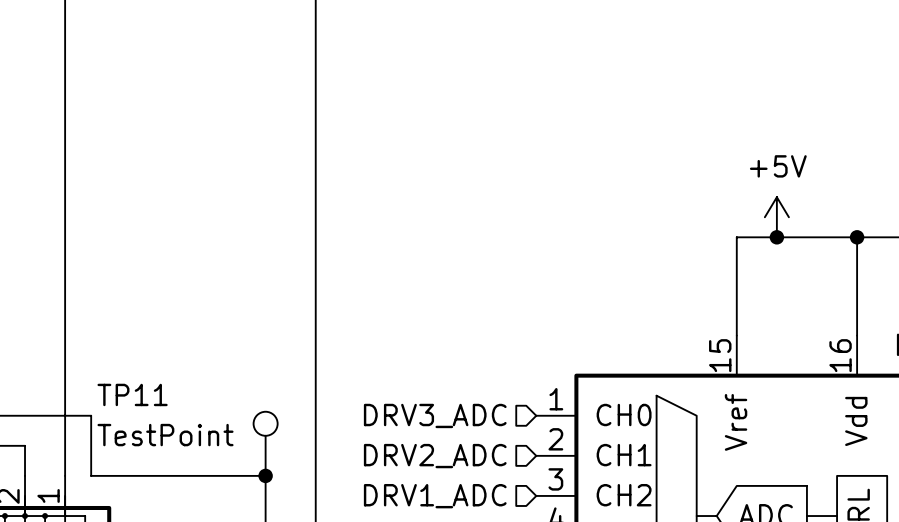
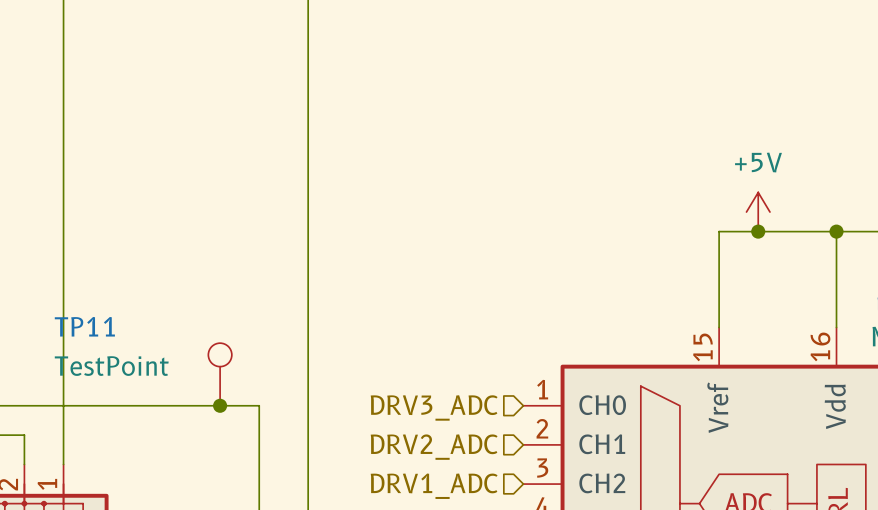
wire: (91, 415) (91, 475) (265, 475) -> (88, 405) (259, 405) (259, 464)
TP11 position: (265, 443) -> (220, 374)
junction position: (265, 475) -> (220, 405)

